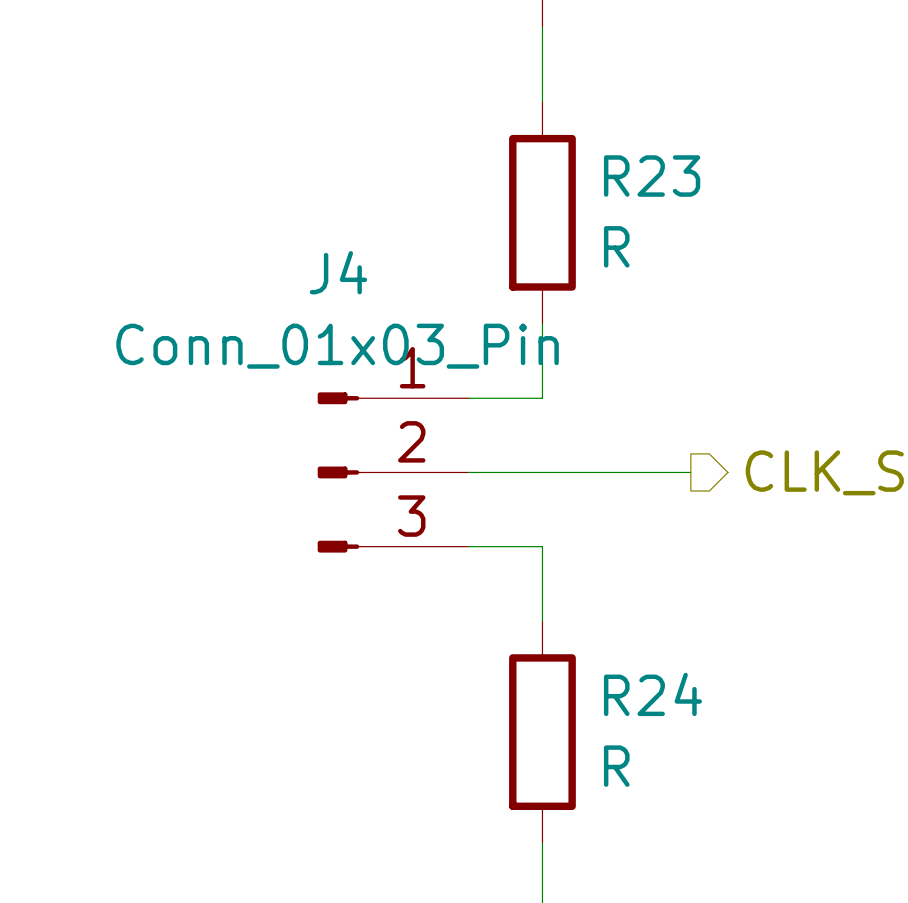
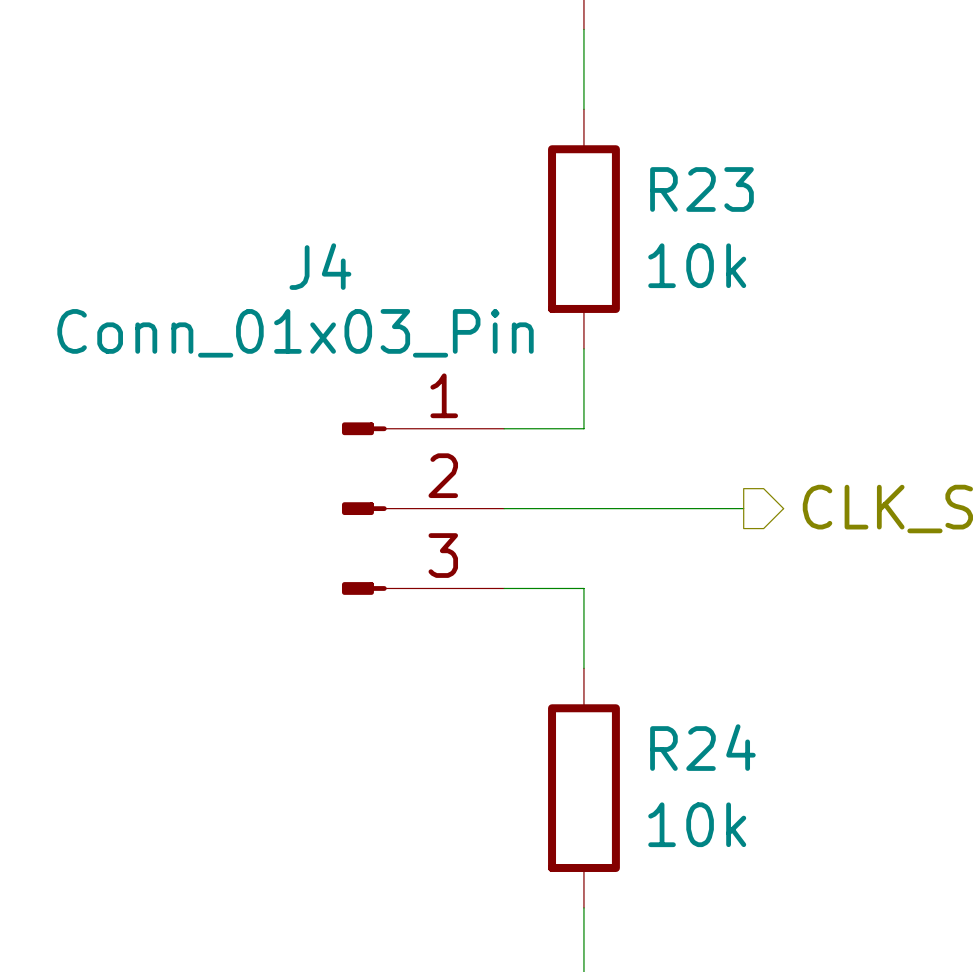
R23 value: R (616, 246) -> 10k (697, 265)
J4 name position: J4 (338, 272) -> J4 (320, 266)
J4 value position: Conn_01x03_Pin (337, 346) -> Conn_01x03_Pin (295, 333)
R24 value: R (616, 766) -> 10k (697, 824)

